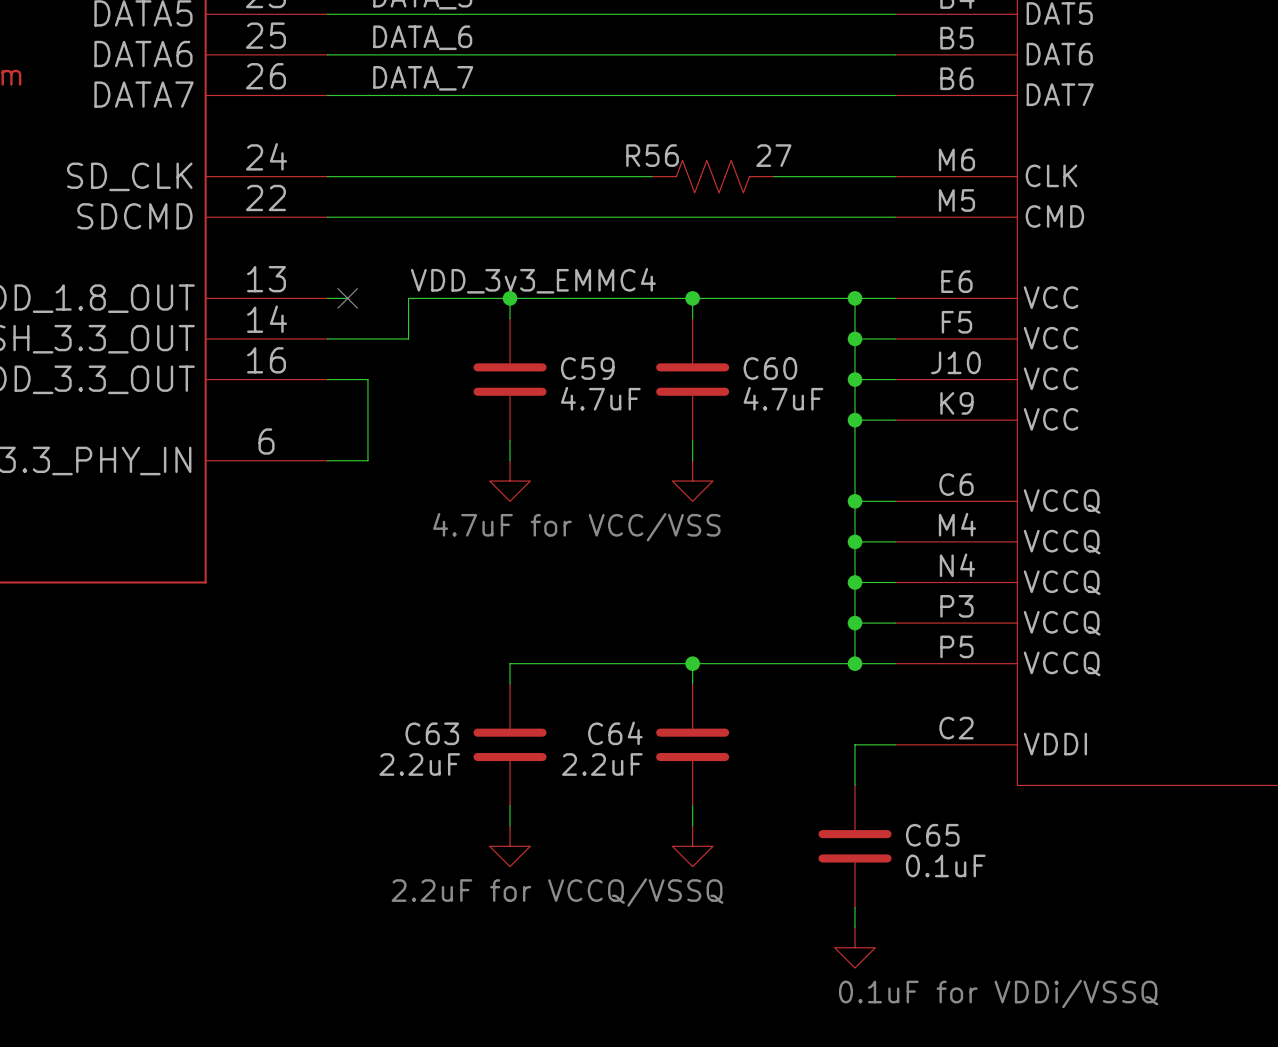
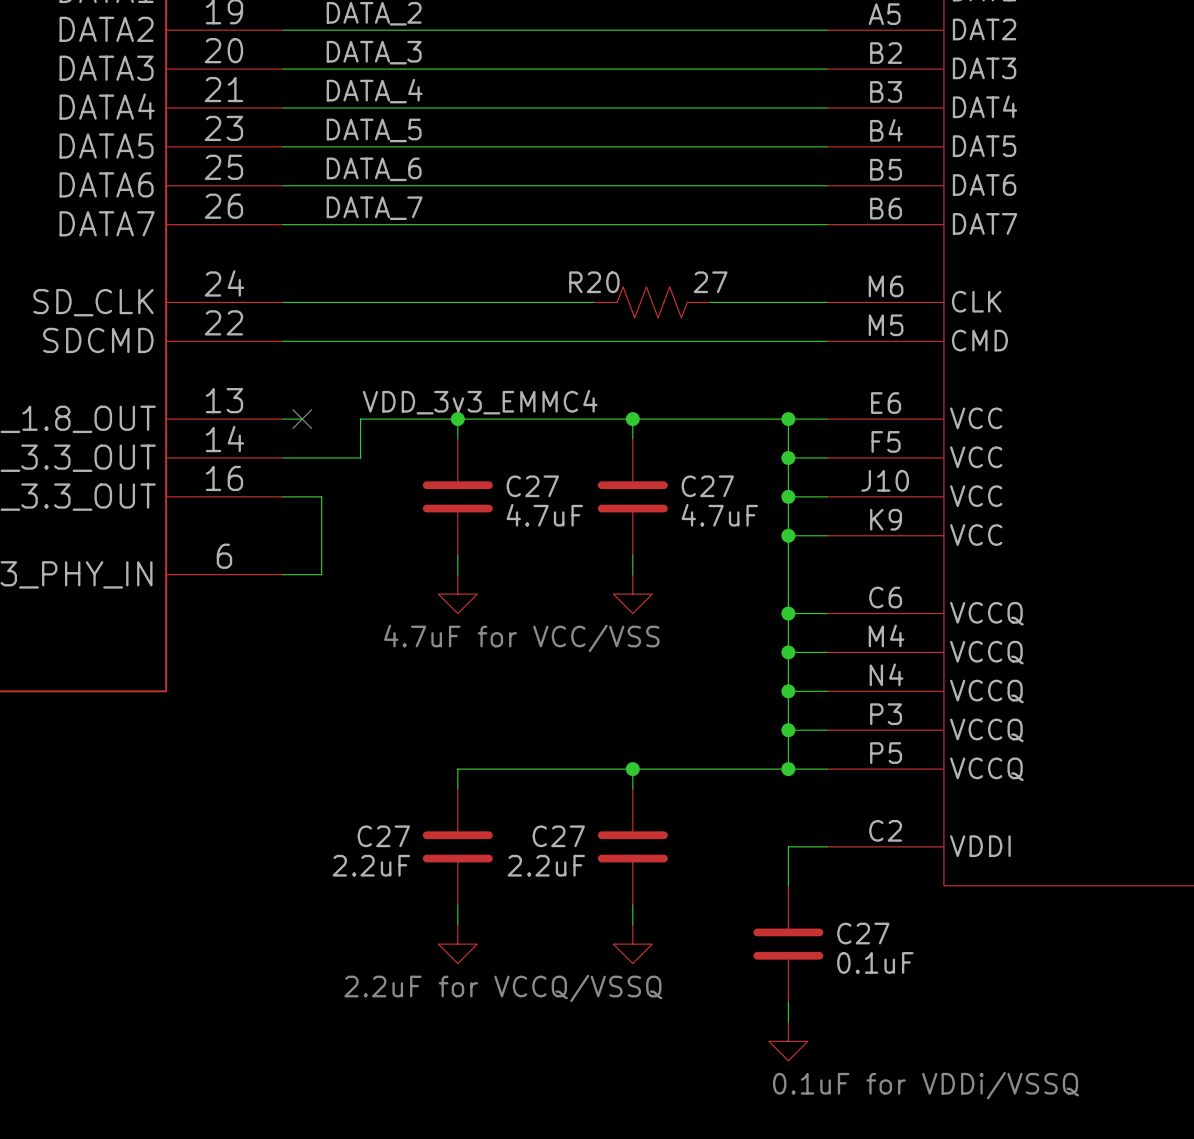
R56 name: R56 (652, 155) -> R20 (594, 282)
C59 name: C59 (587, 368) -> C27 (532, 486)
C60 name: C60 (770, 368) -> C27 (707, 486)
C63 name: C63 (432, 733) -> C27 (383, 836)
C64 name: C64 (615, 733) -> C27 (558, 836)
C65 name: C65 (932, 835) -> C27 (863, 933)

